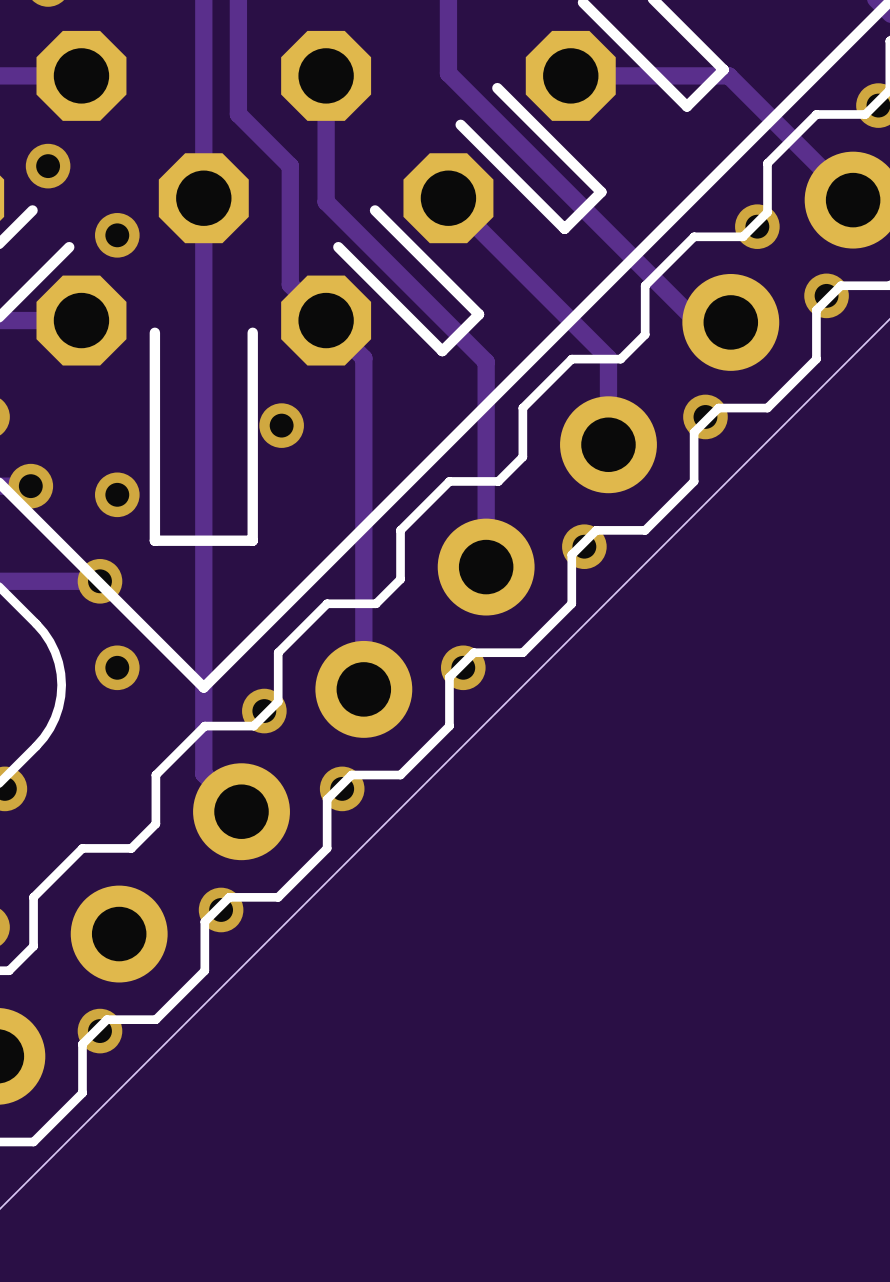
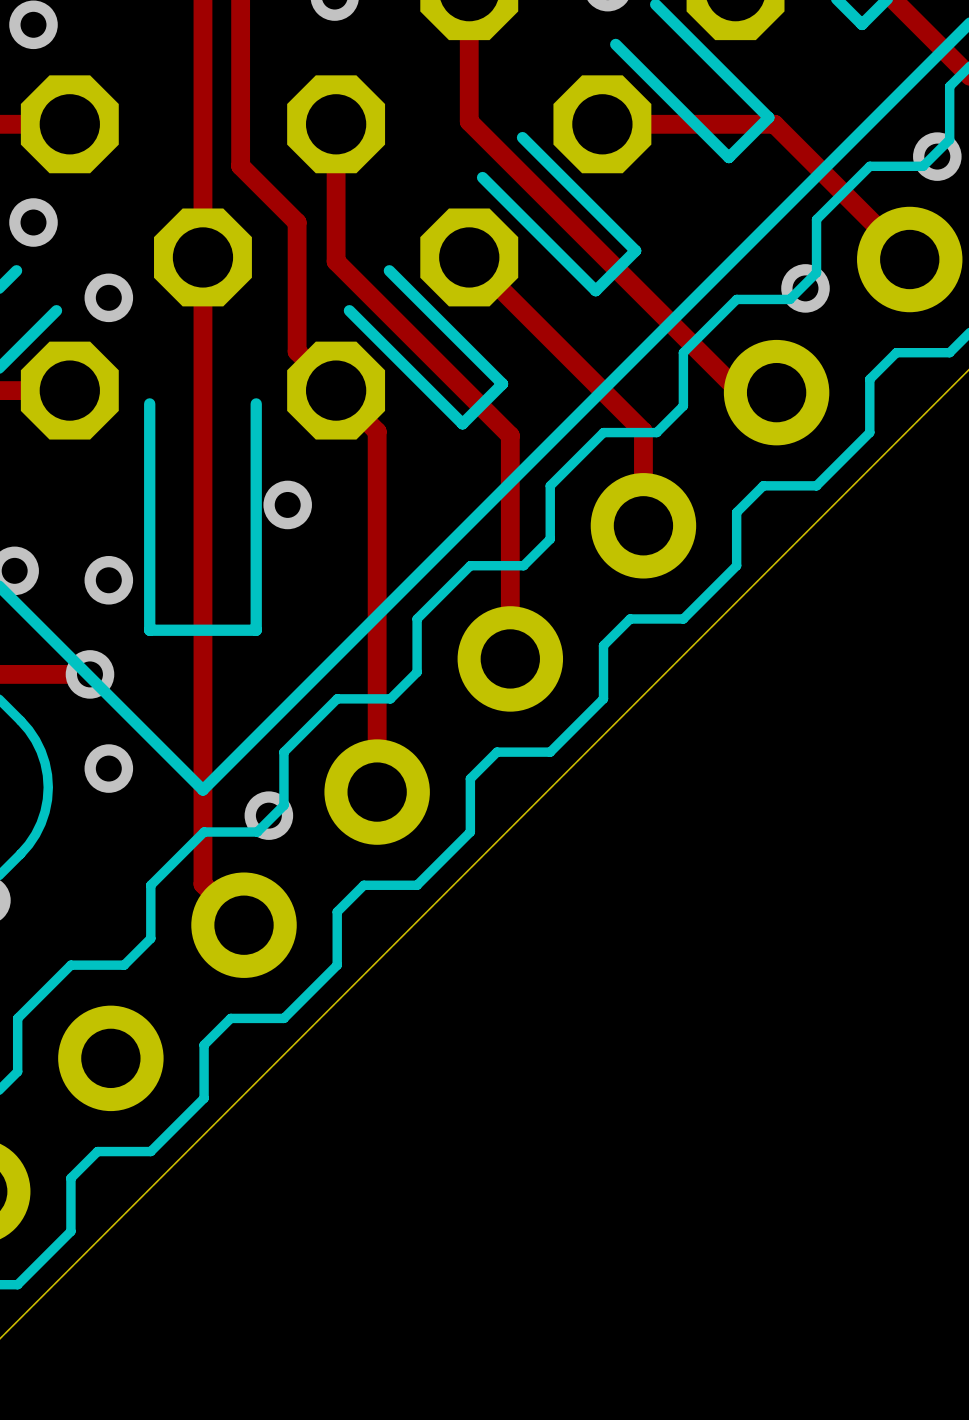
via: (826, 295) -> none
via: (705, 416) -> none
via: (584, 546) -> none
via: (463, 667) -> none
via: (342, 788) -> none
via: (221, 909) -> none
via: (100, 1031) -> none

